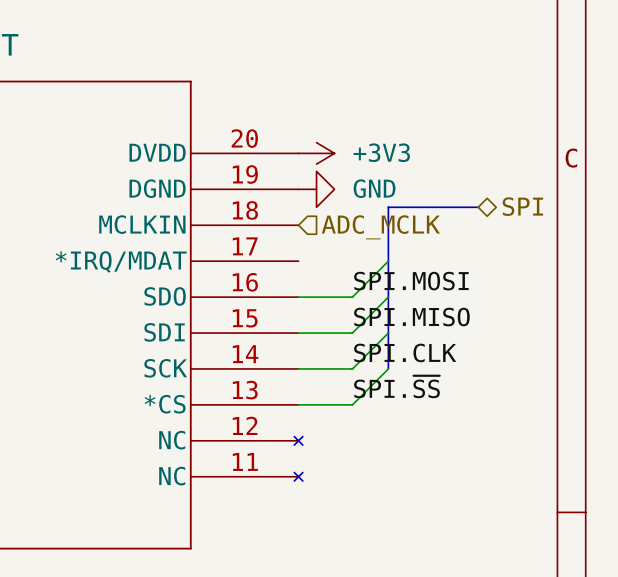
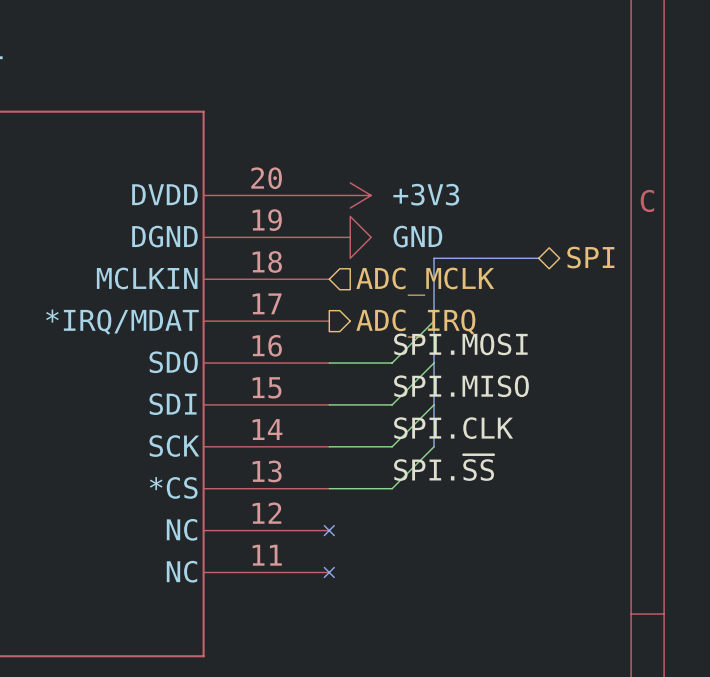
hierarchical label: none -> ADC_IRQ (415, 323)

